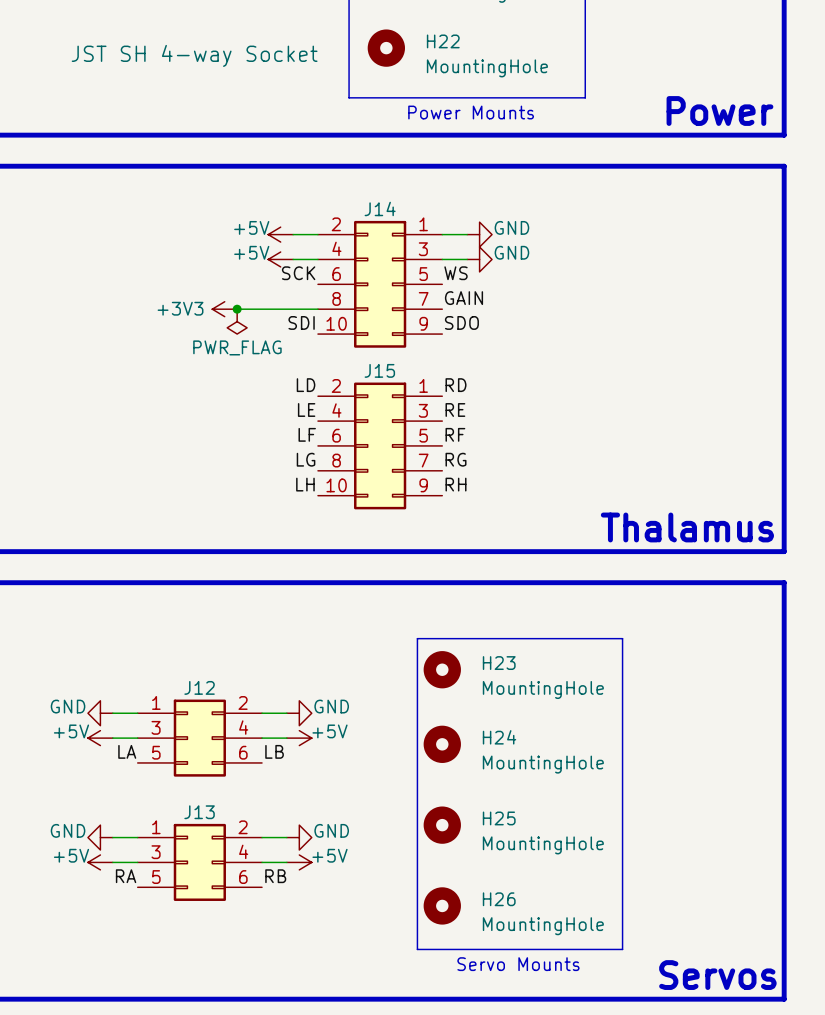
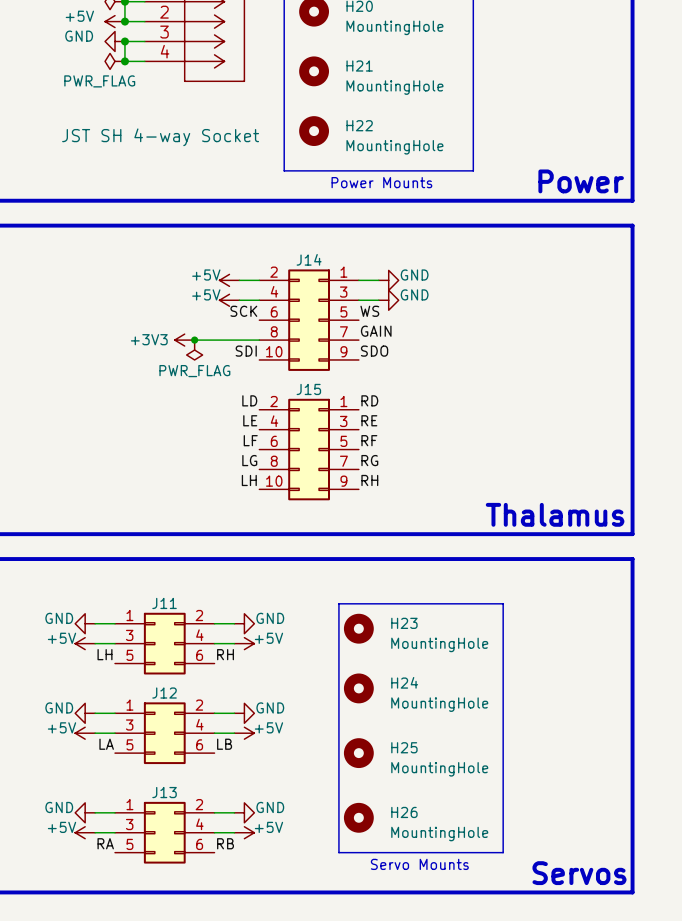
power symbol: none -> GND (85, 623)
wire: none -> (95, 623) (115, 623)
wire: none -> (214, 623) (234, 623)
power symbol: none -> GND (244, 623)
power symbol: none -> +5V (85, 643)
wire: none -> (95, 643) (115, 643)
J11: none -> (164, 643)
wire: none -> (214, 643) (234, 643)
power symbol: none -> +5V (244, 643)
label: none -> LH (104, 654)
label: none -> RH (225, 654)
power symbol: GND (100, 713) -> none
wire: (112, 713) (137, 713) -> (95, 713) (115, 713)
wire: (262, 713) (286, 713) -> (214, 713) (234, 713)
power symbol: GND (299, 713) -> none
power symbol: +5V (100, 738) -> none
wire: (112, 738) (137, 738) -> (95, 733) (115, 733)
J12 position: (199, 738) -> (164, 733)
wire: (262, 738) (286, 738) -> (214, 733) (234, 733)
power symbol: +5V (299, 738) -> none
label position: LA (127, 751) -> LA (106, 744)
label position: LB (274, 751) -> LB (224, 744)
power symbol: none -> GND (85, 713)
power symbol: none -> GND (244, 713)
power symbol: none -> +5V (85, 733)
power symbol: none -> +5V (244, 733)
power symbol: GND (100, 837) -> none
wire: (112, 837) (137, 837) -> (95, 812) (115, 812)
wire: (262, 837) (286, 837) -> (214, 812) (234, 812)
power symbol: GND (299, 837) -> none
power symbol: +5V (100, 862) -> none
wire: (112, 862) (137, 862) -> (95, 832) (115, 832)
J13 position: (199, 862) -> (164, 832)
wire: (262, 862) (286, 862) -> (214, 832) (234, 832)
power symbol: +5V (299, 862) -> none
label position: RA (126, 876) -> RA (105, 843)
label position: RB (275, 876) -> RB (225, 843)
power symbol: none -> GND (85, 812)
power symbol: none -> GND (244, 812)
power symbol: none -> +5V (85, 832)
power symbol: none -> +5V (244, 832)

